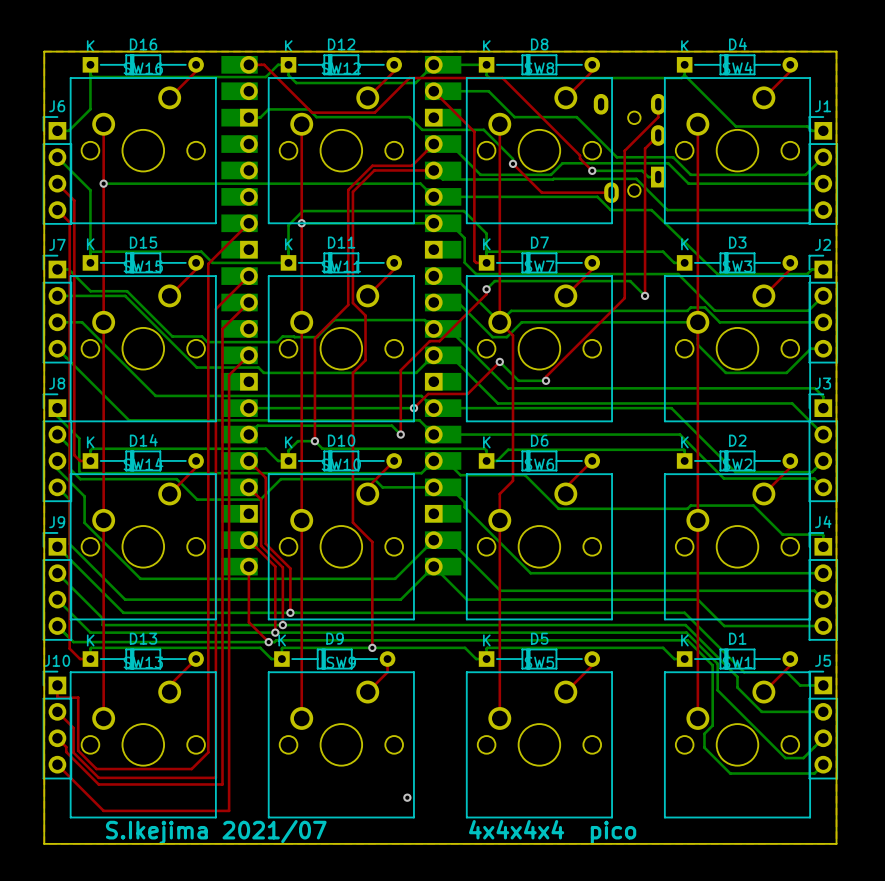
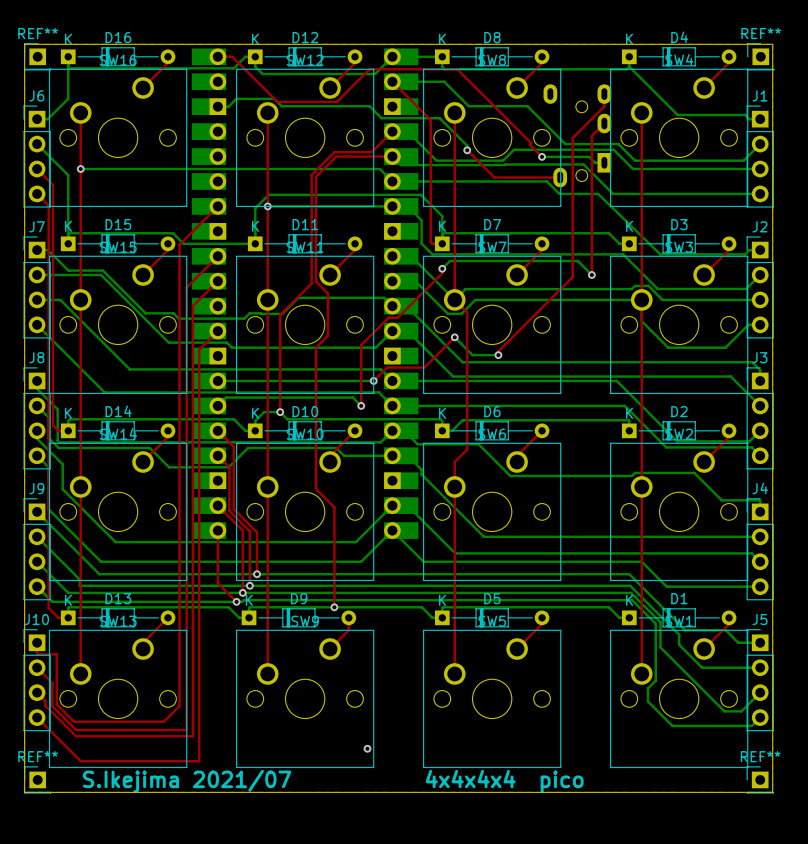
REF**: none -> (37, 56)
REF**: none -> (760, 56)
REF**: none -> (37, 779)
REF**: none -> (760, 779)

